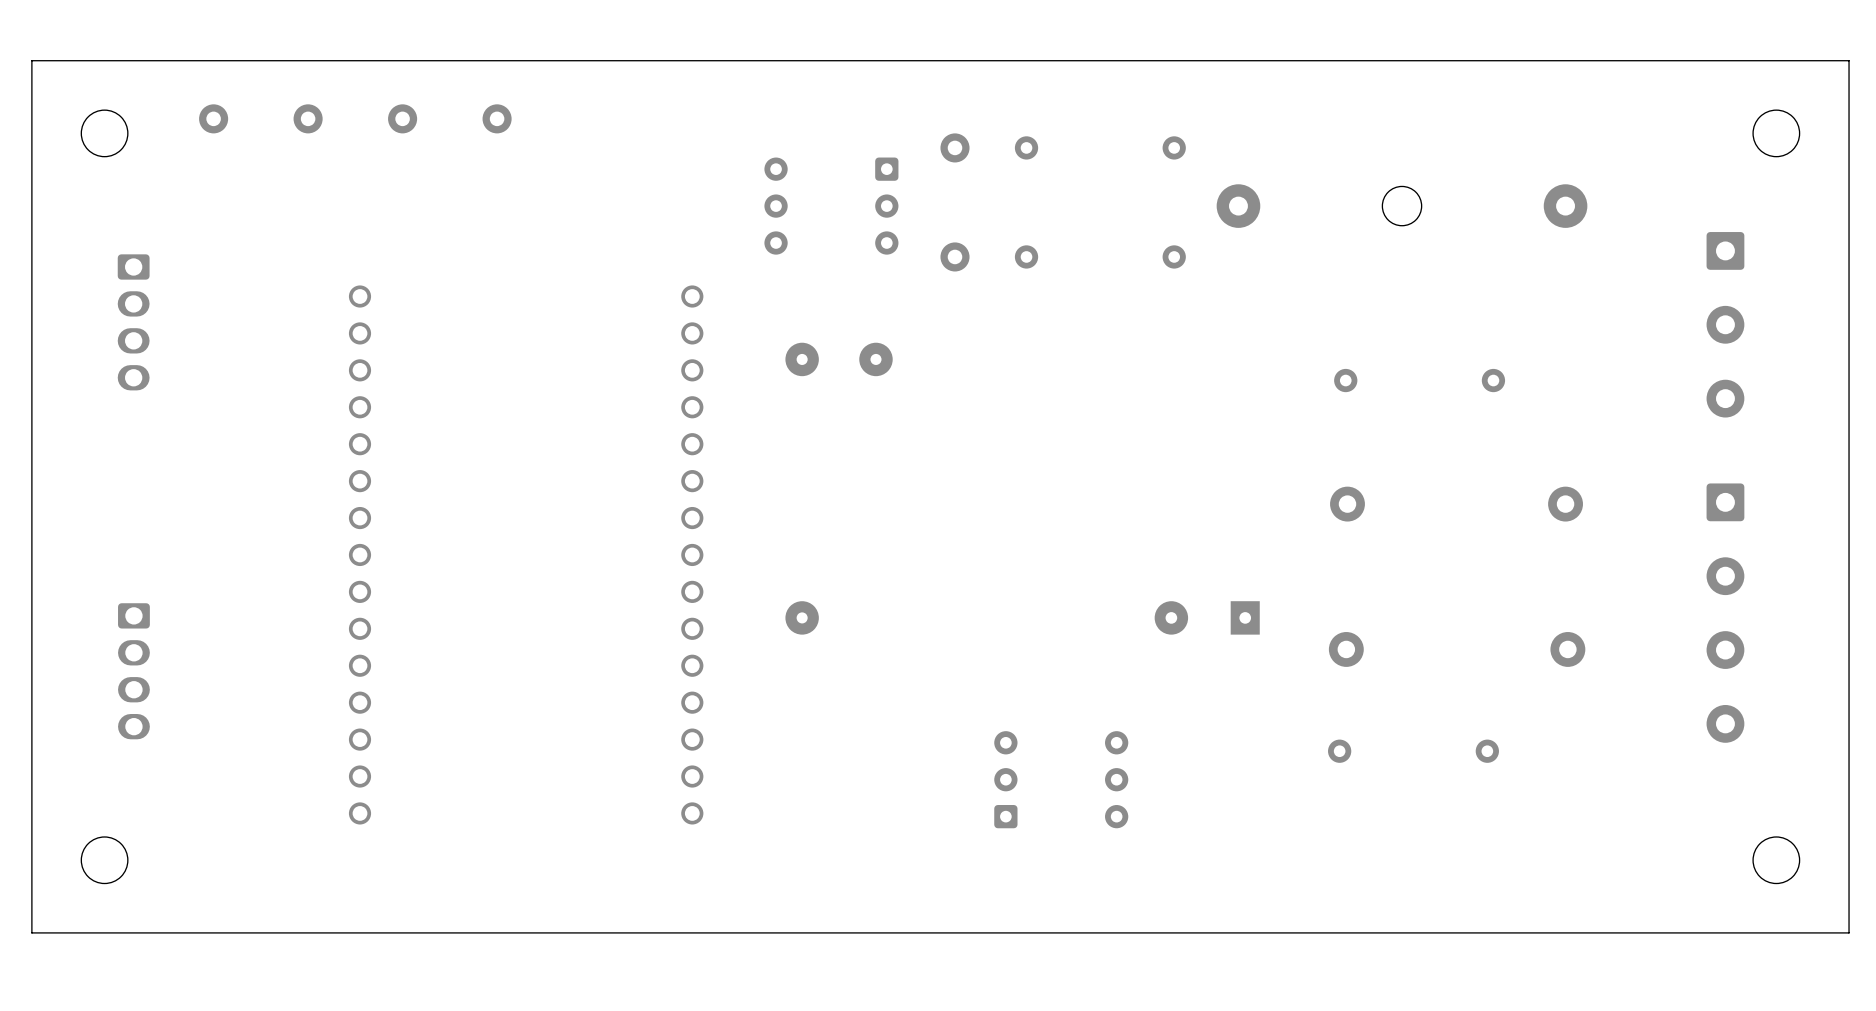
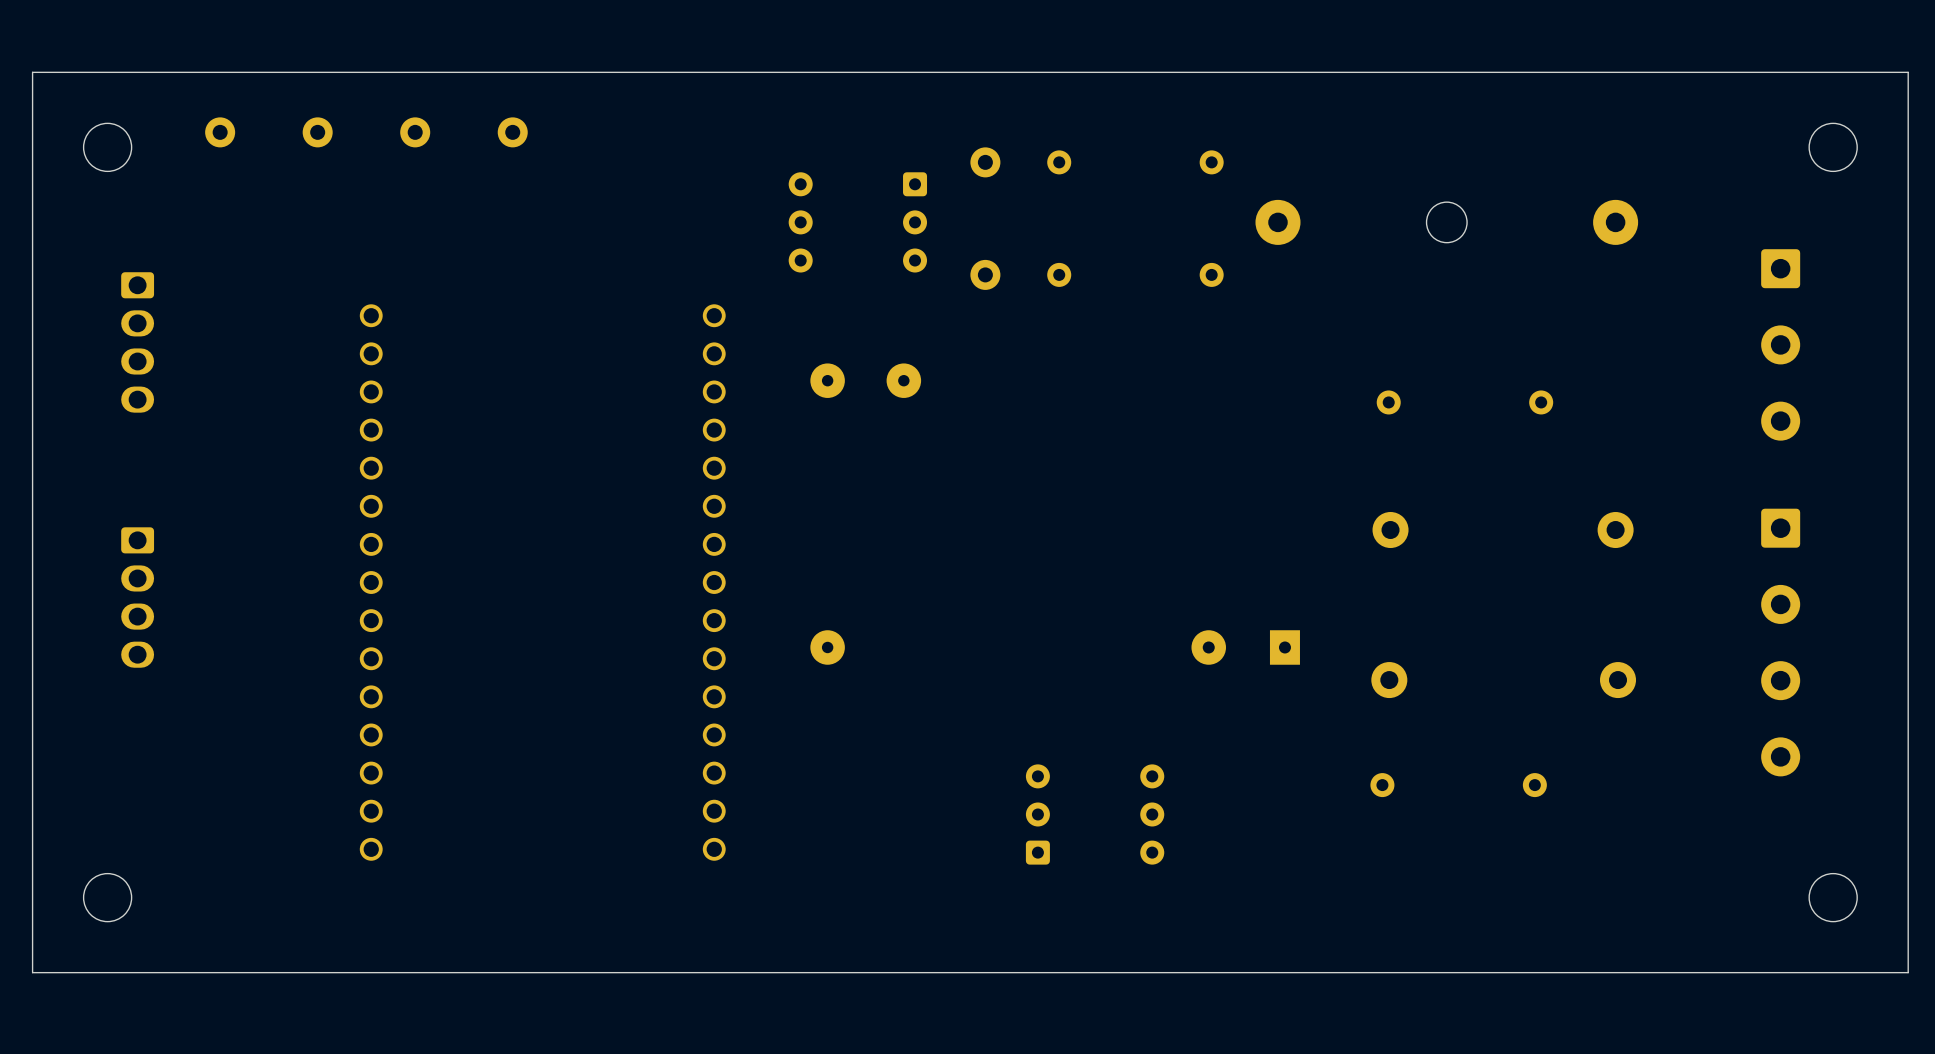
part position: (133, 671) -> (137, 597)

